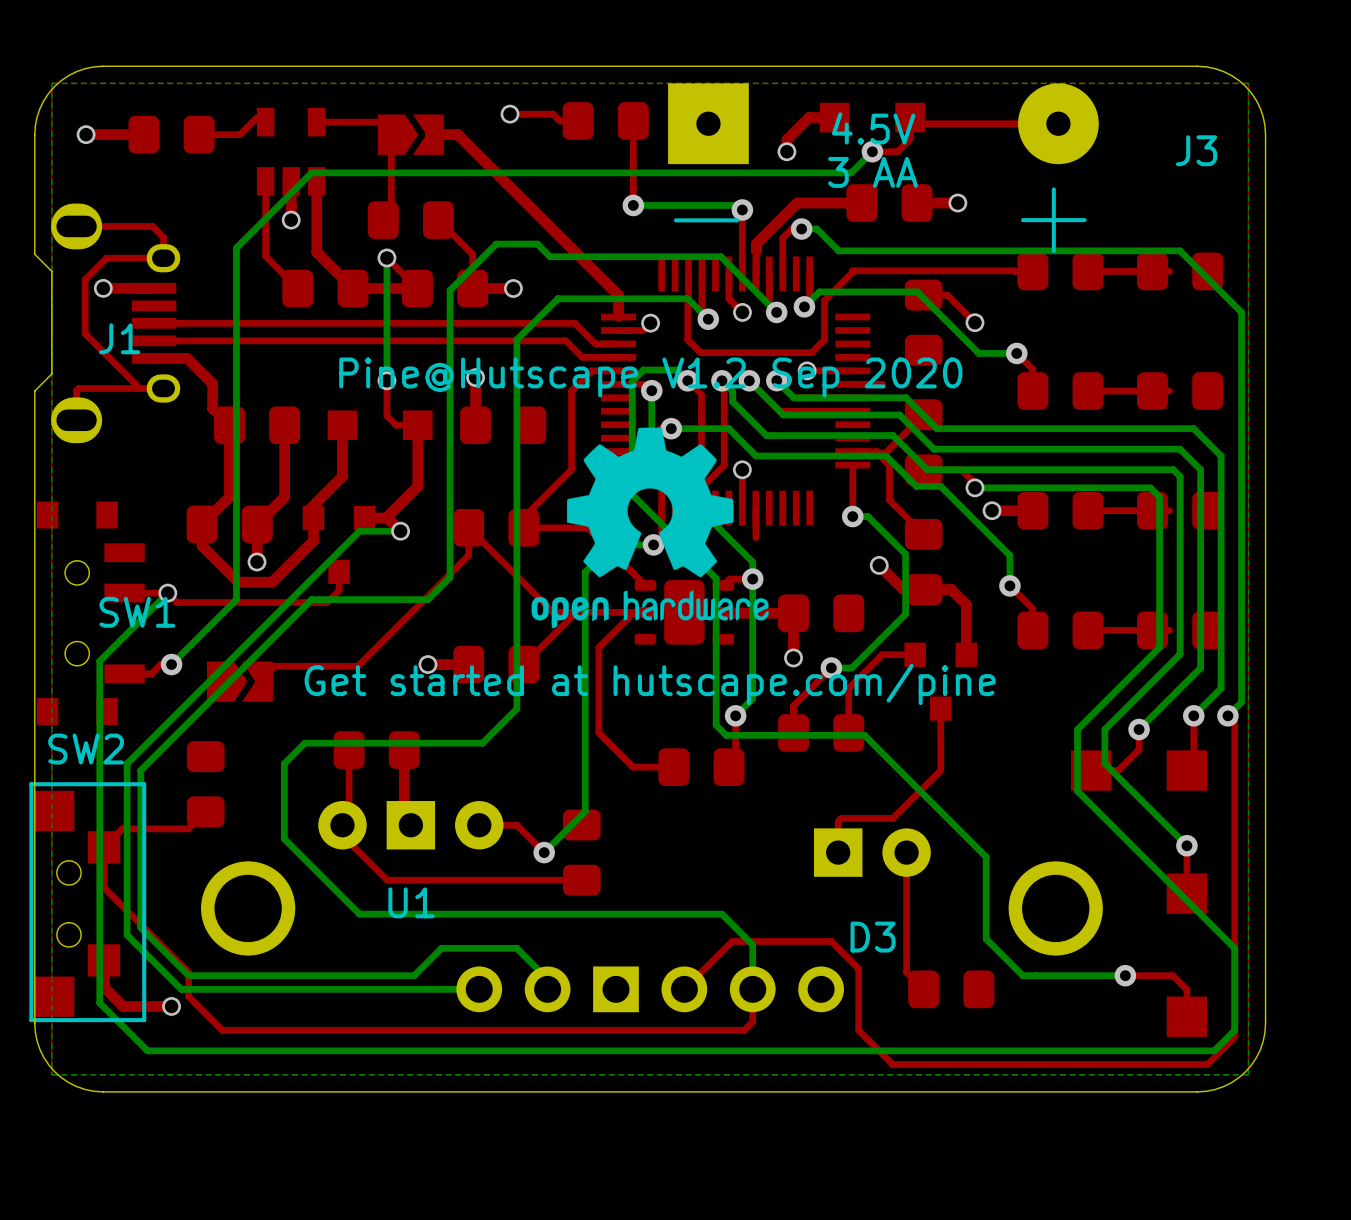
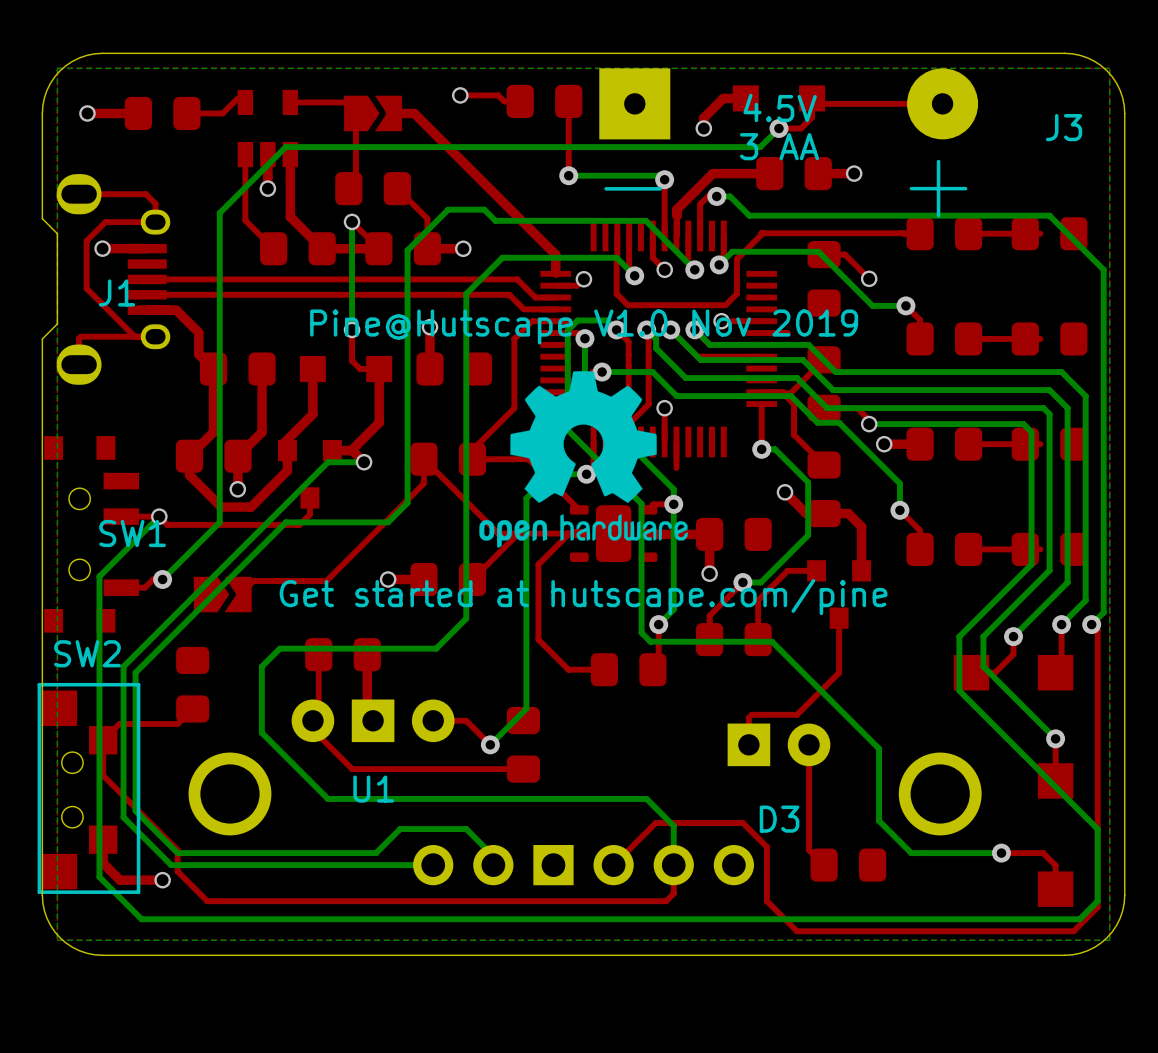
text: Pine@Hutscape V1.2 Sep 2020 (650, 377) -> Pine@Hutscape V1.0 Nov 2019 (584, 326)

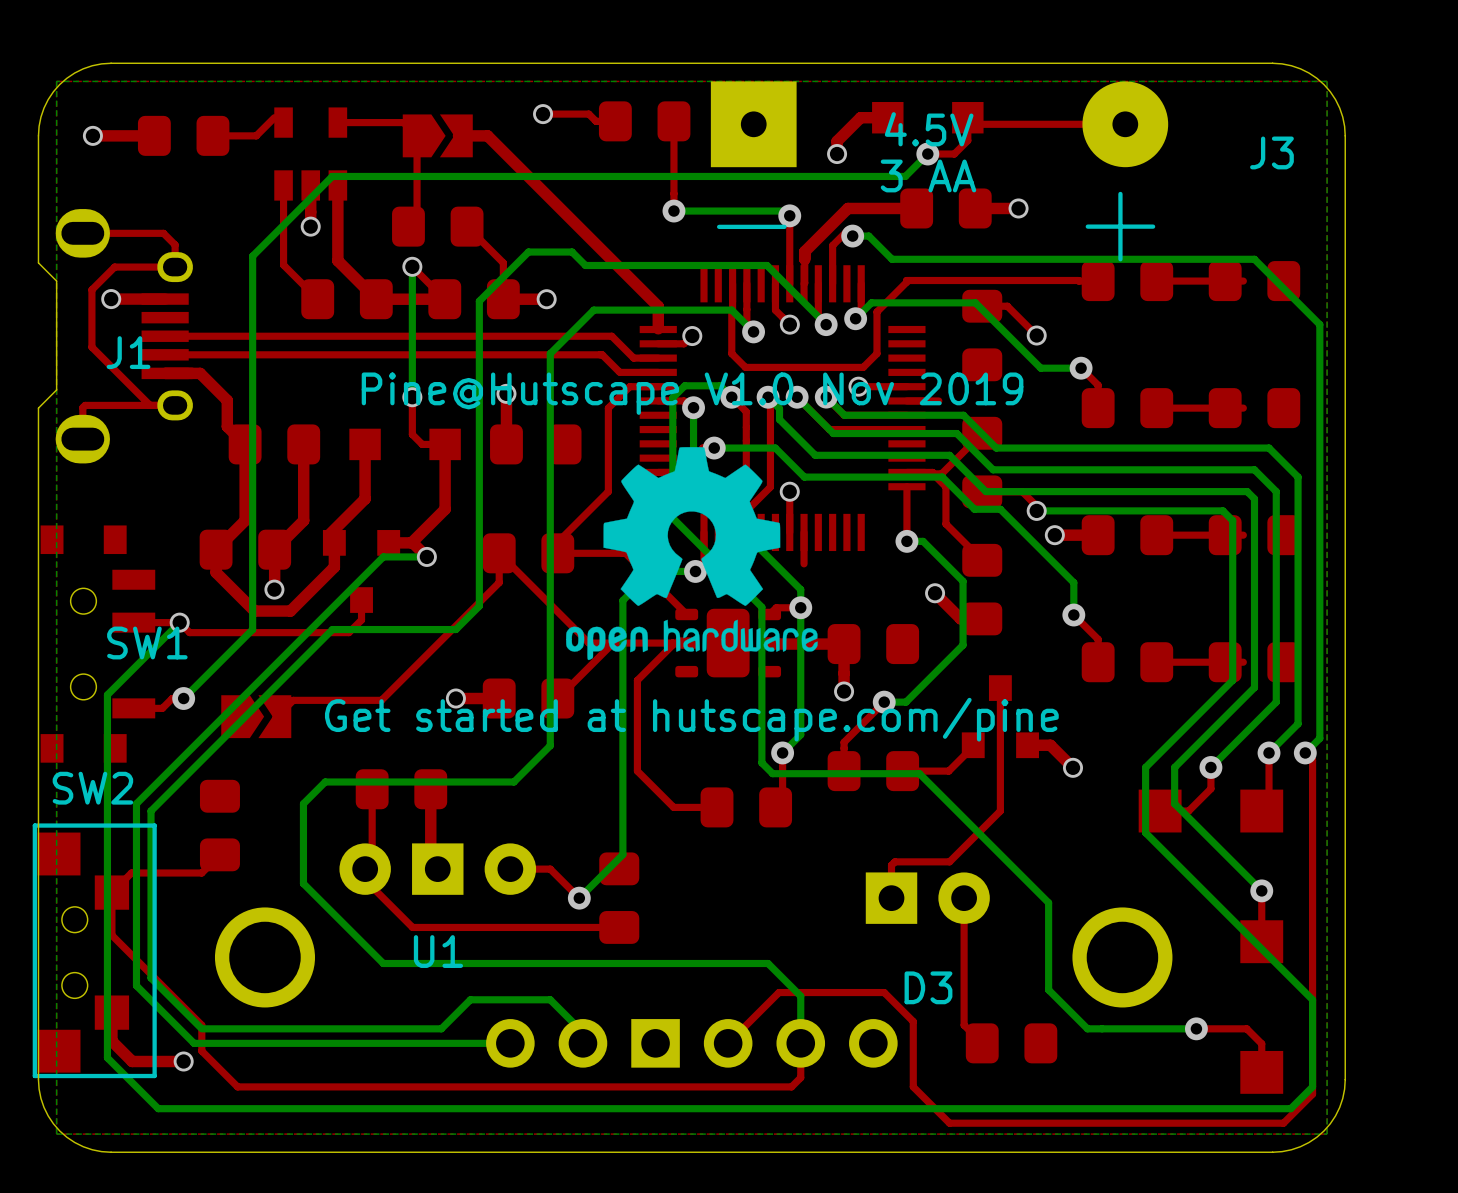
top track: (824, 513) (848, 513) (861, 526) (861, 570) -> none
top track: (816, 570) (787, 570) (758, 600) (758, 639) -> (973, 745) (948, 771) (902, 771)
top track: none -> (1000, 688) (1000, 745)
part rotation: 0° (839, 594) -> 180° (1000, 716)
top track: none -> (1027, 745) (1050, 745) (1073, 767)
via: none -> (1073, 767)

